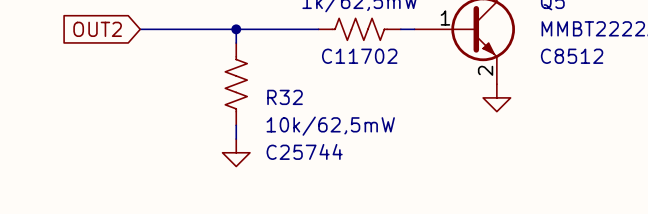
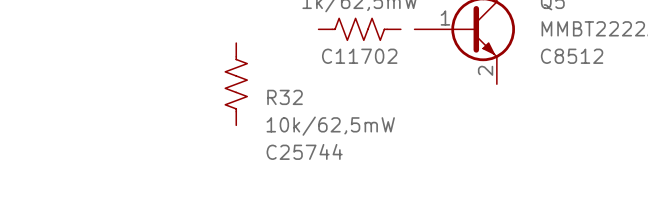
global label: OUT2 (97, 29) -> none
wire: (140, 29) (318, 29) -> none
wire: (236, 29) (236, 43) -> none
junction: (236, 29) -> none
wire: (400, 29) (414, 29) -> none
power symbol: (496, 97) -> none
wire: (236, 125) (236, 139) -> none
power symbol: (236, 152) -> none

